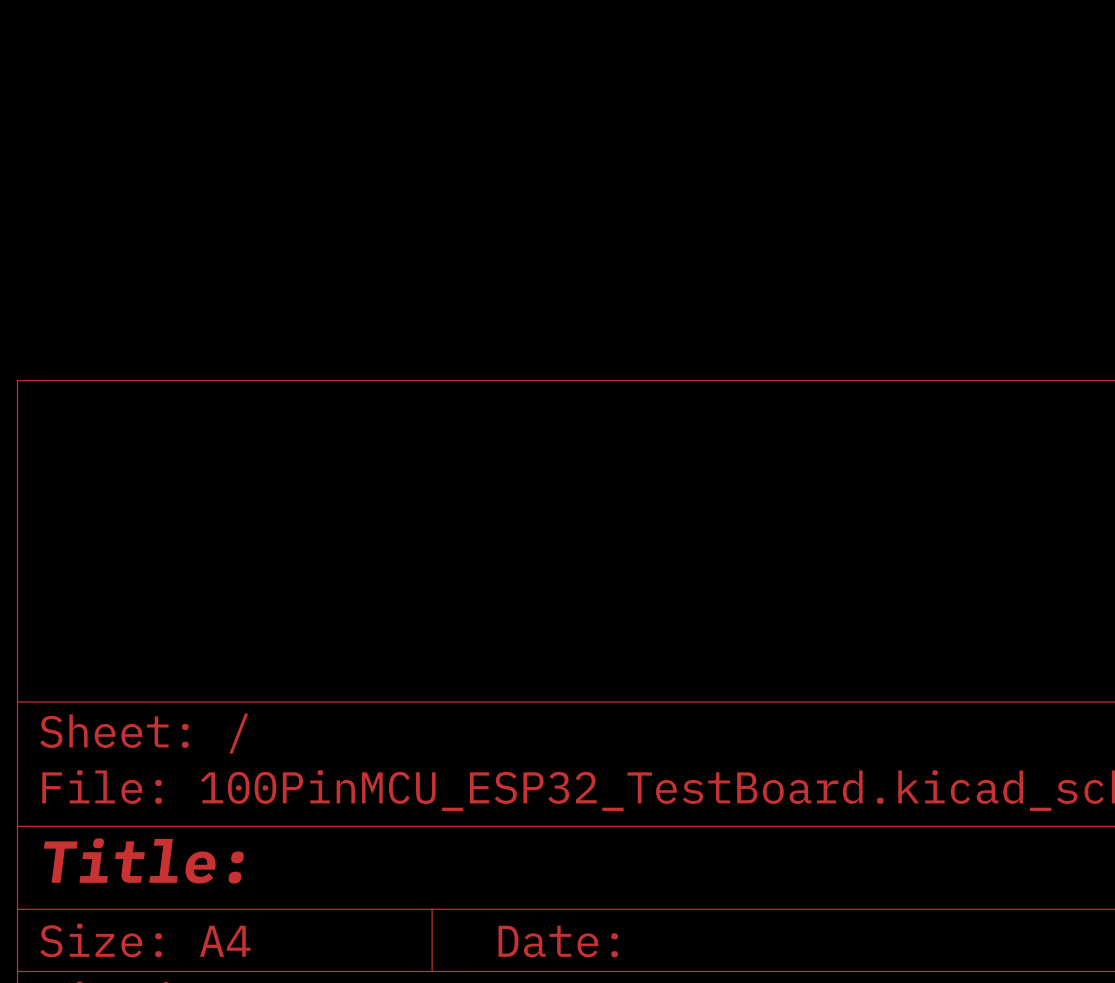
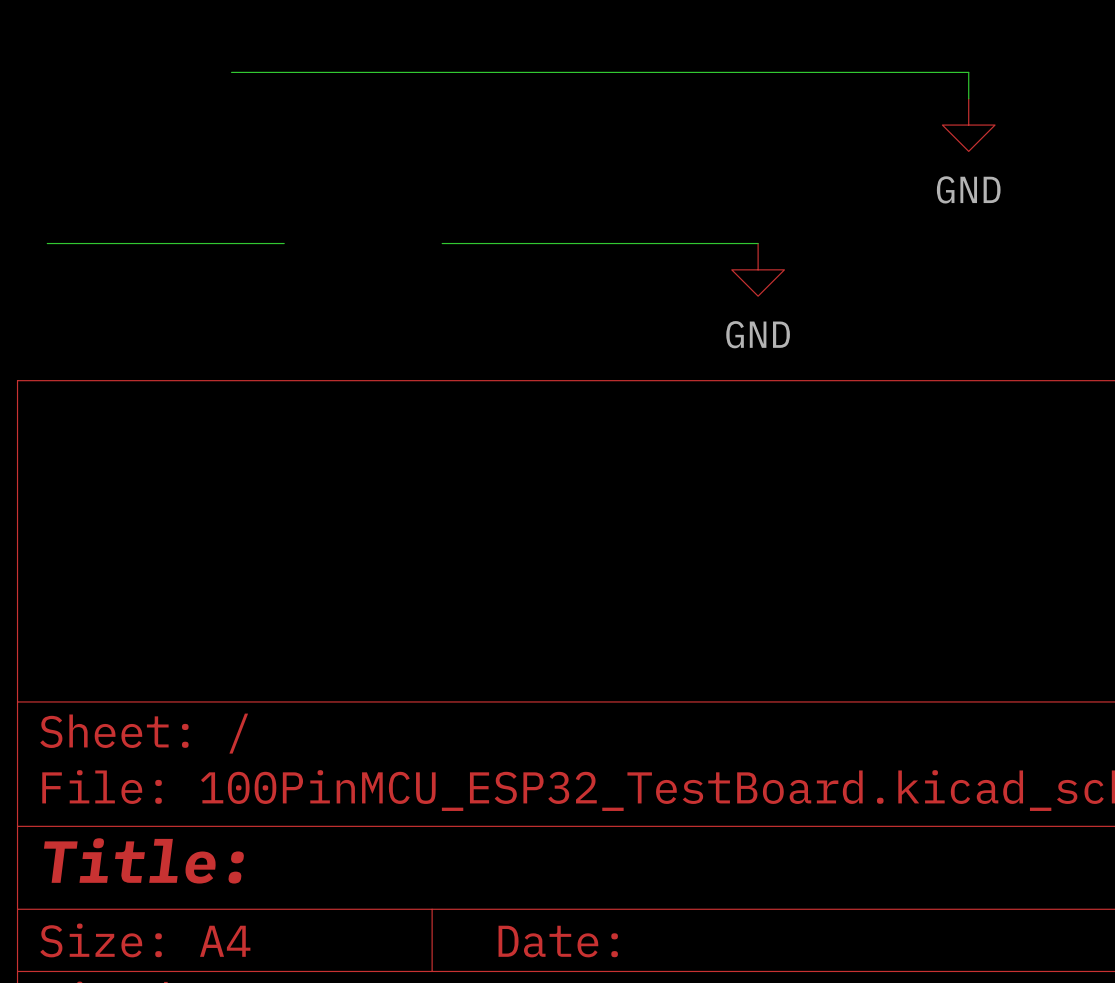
wire: none -> (231, 72) (968, 72) (968, 98)
power symbol: none -> GND (968, 125)
wire: none -> (47, 243) (284, 243)
wire: none -> (442, 243) (758, 243)
power symbol: none -> GND (758, 269)

